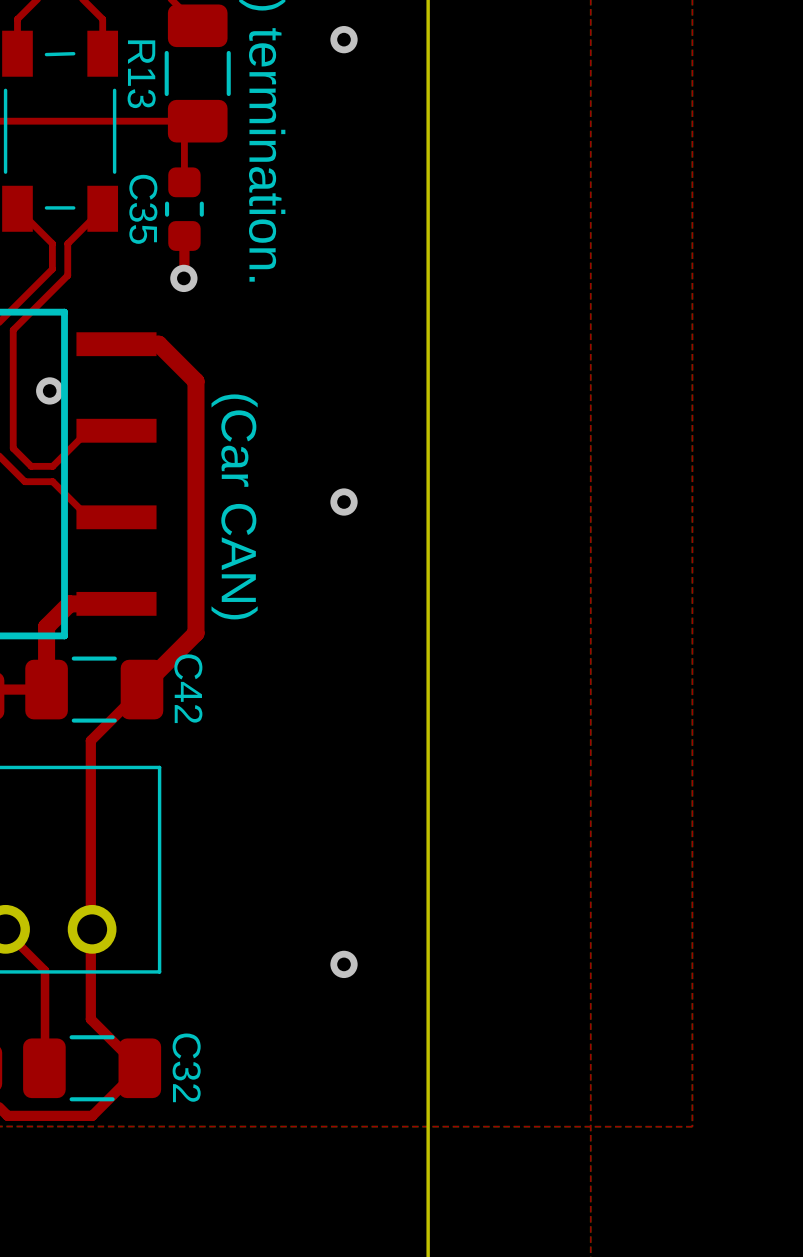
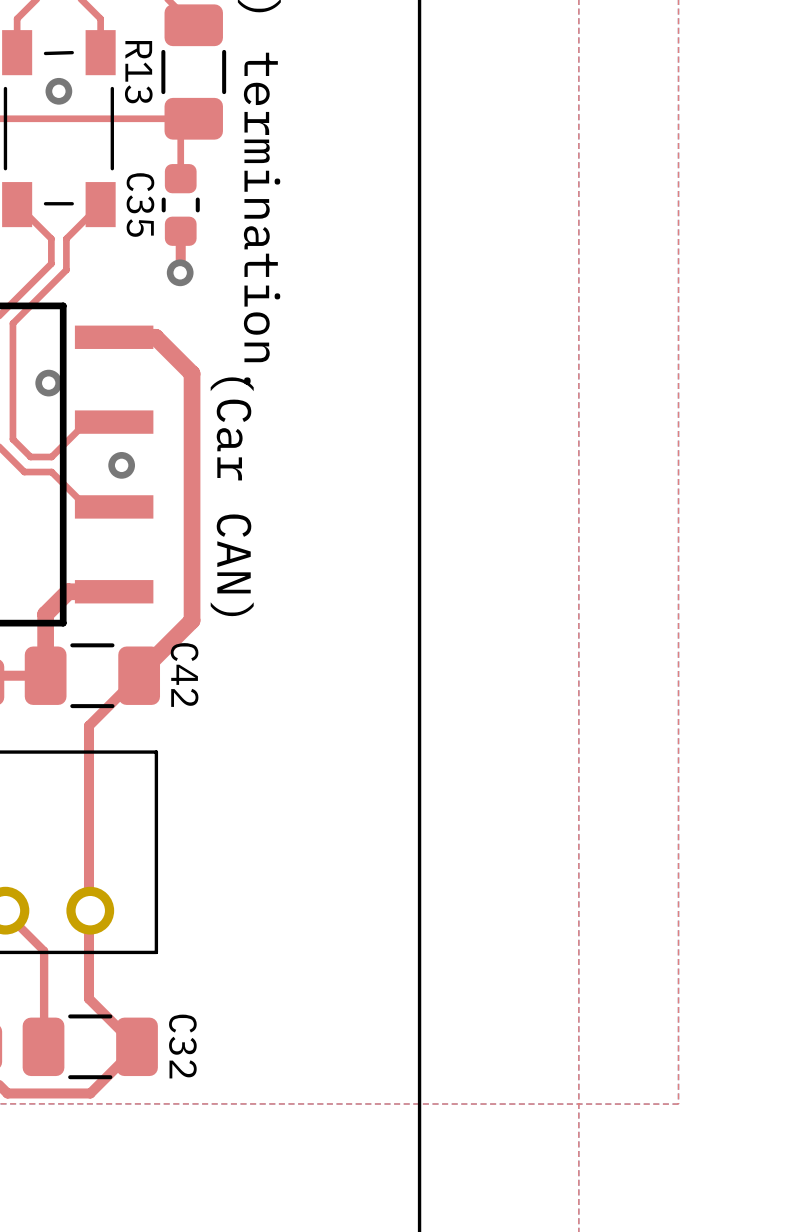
via: (344, 39) -> none
via: none -> (58, 91)
via: none -> (121, 465)
via: (344, 502) -> none
via: (344, 964) -> none

